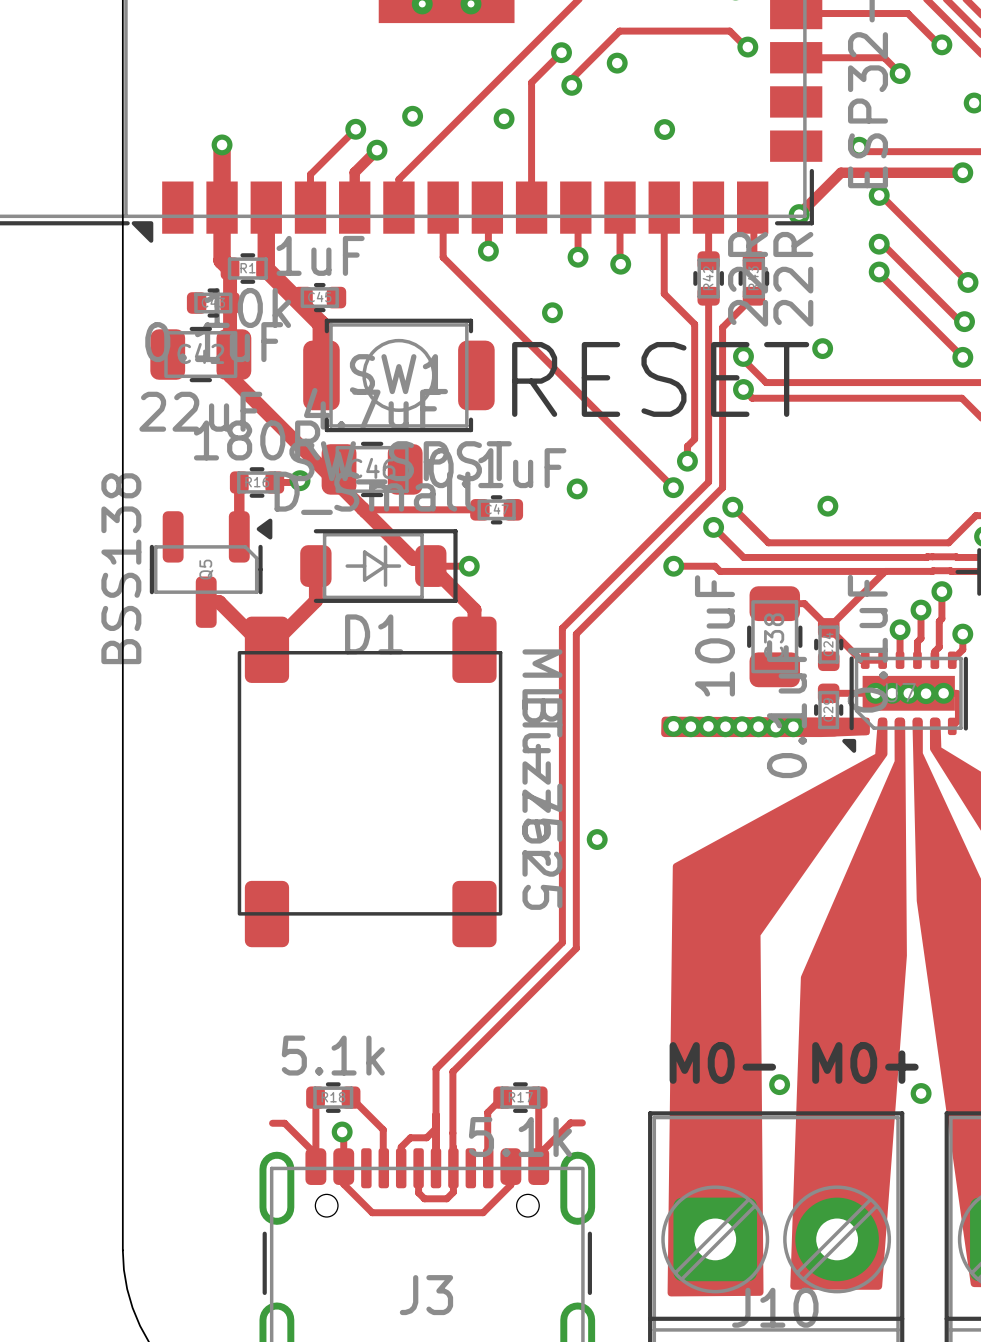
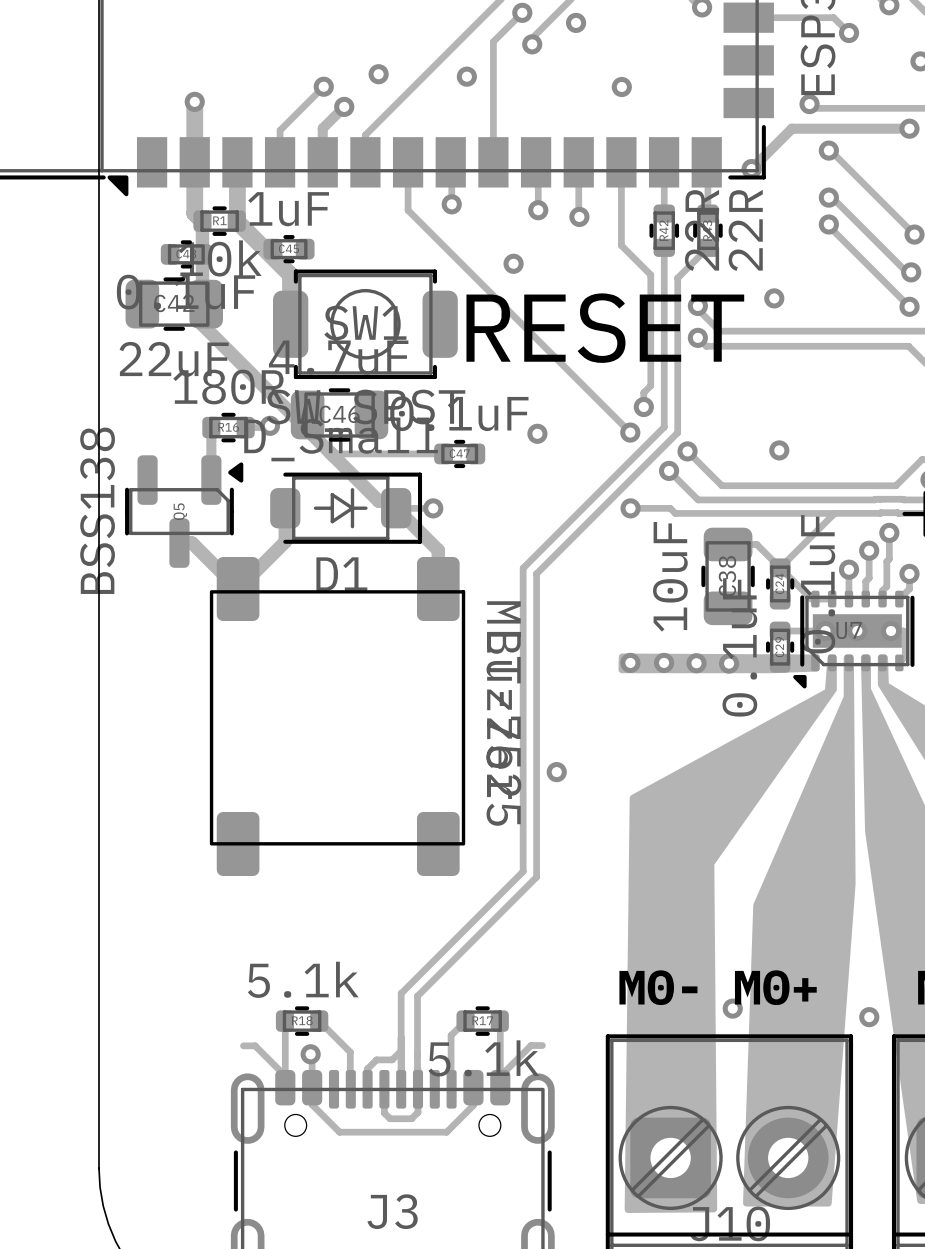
via: (892, 693) -> none
via: (926, 693) -> none
via: (690, 726) -> none
via: (725, 726) -> none
via: (758, 726) -> none
via: (793, 726) -> none

